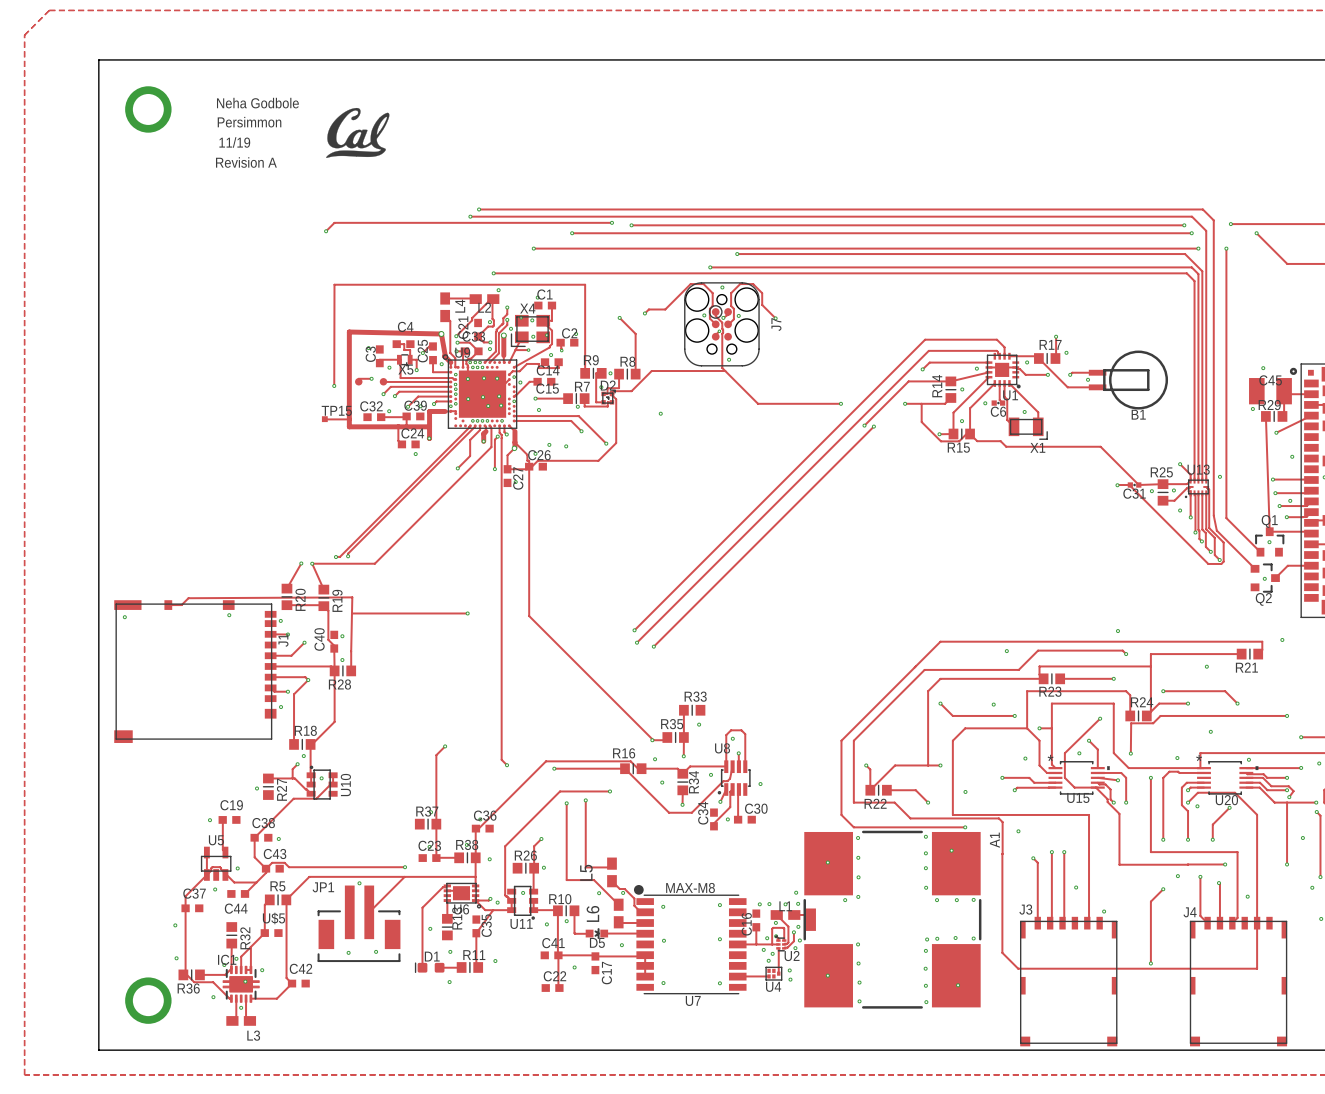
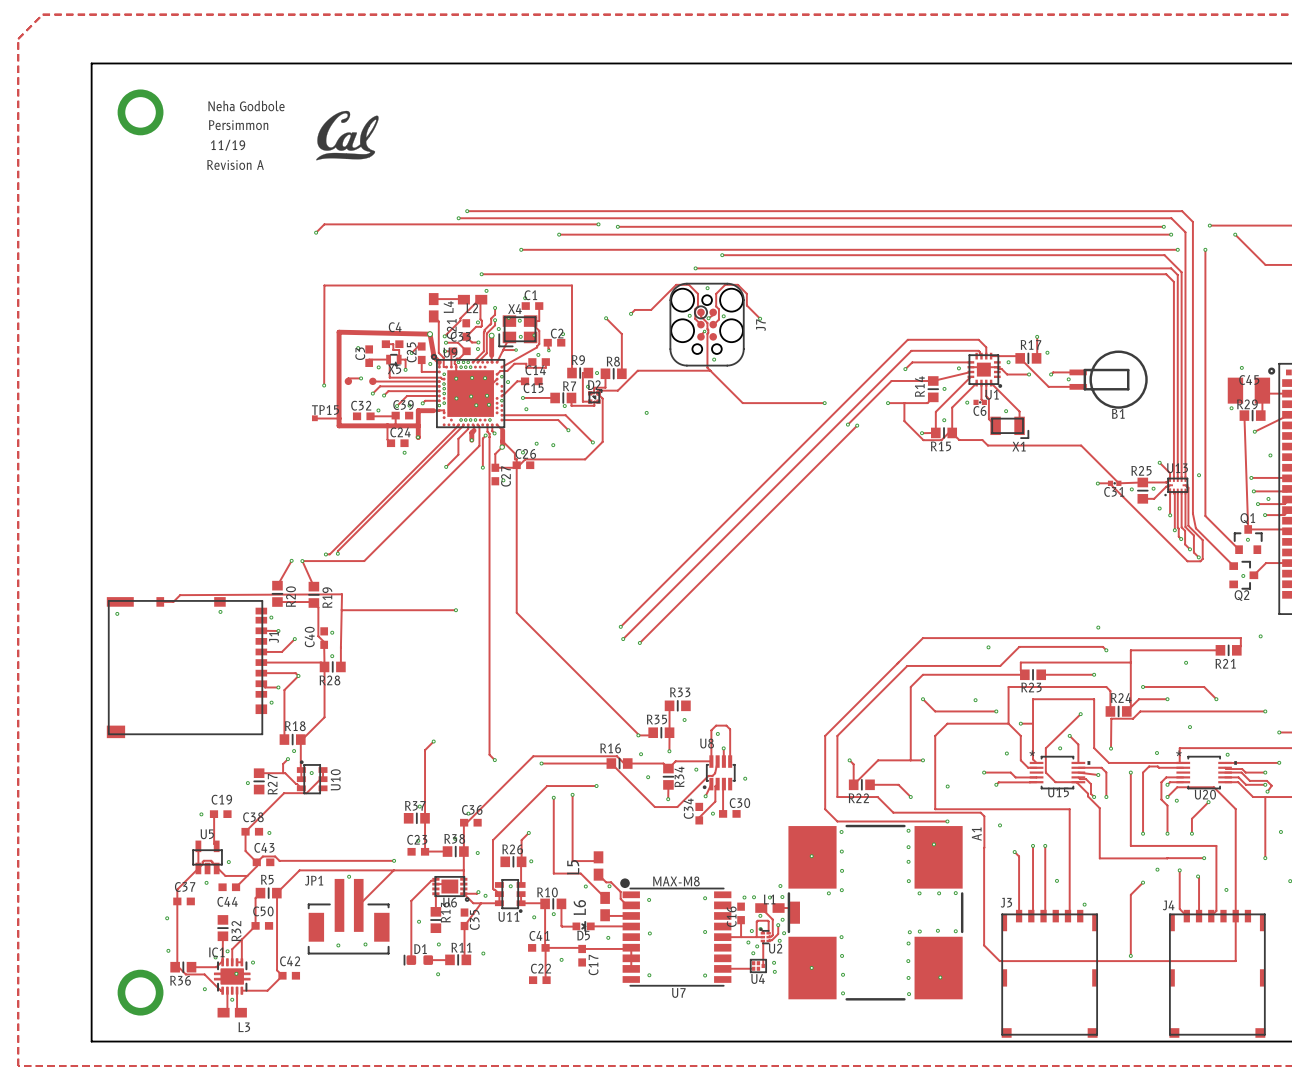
U$5 name: U$5 (273, 918) -> C50 (263, 911)

